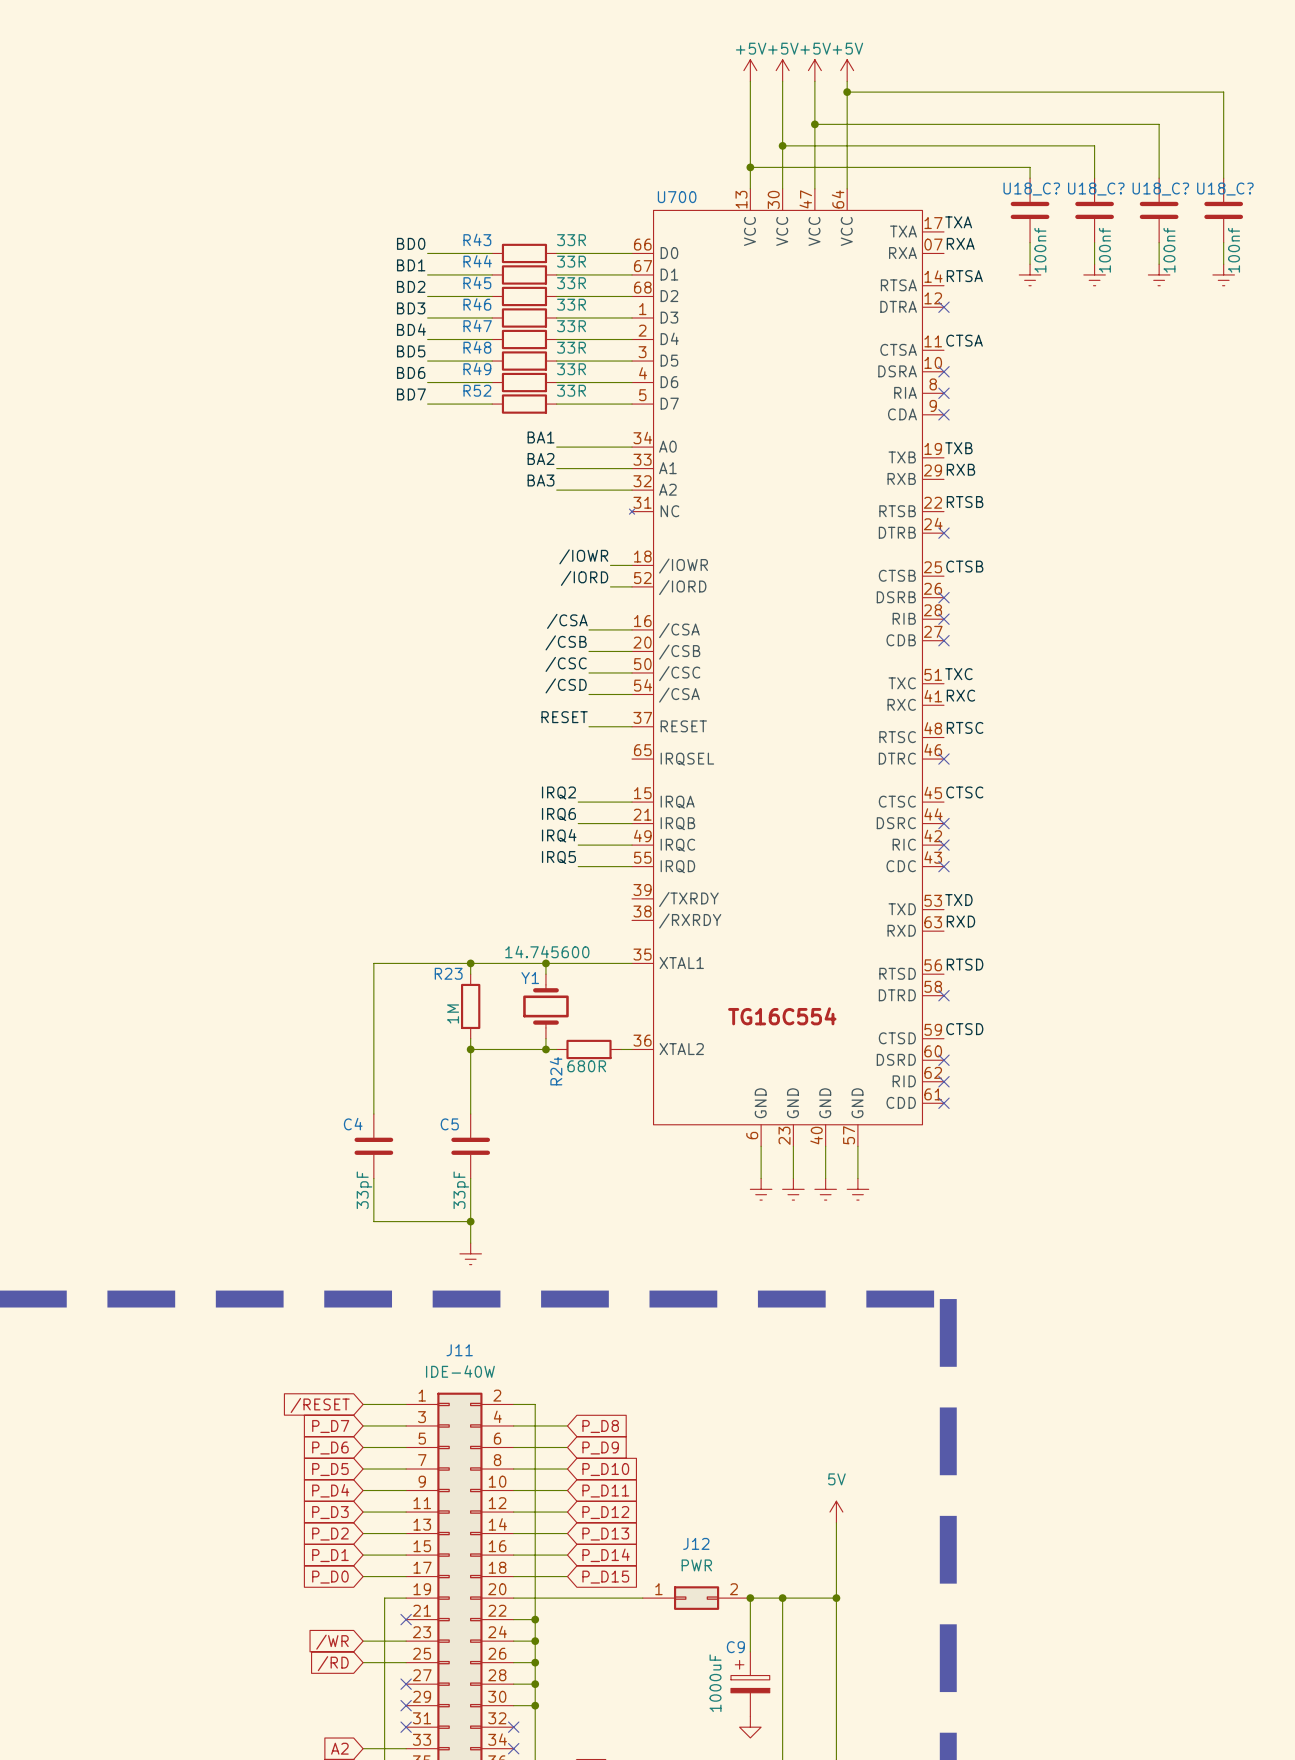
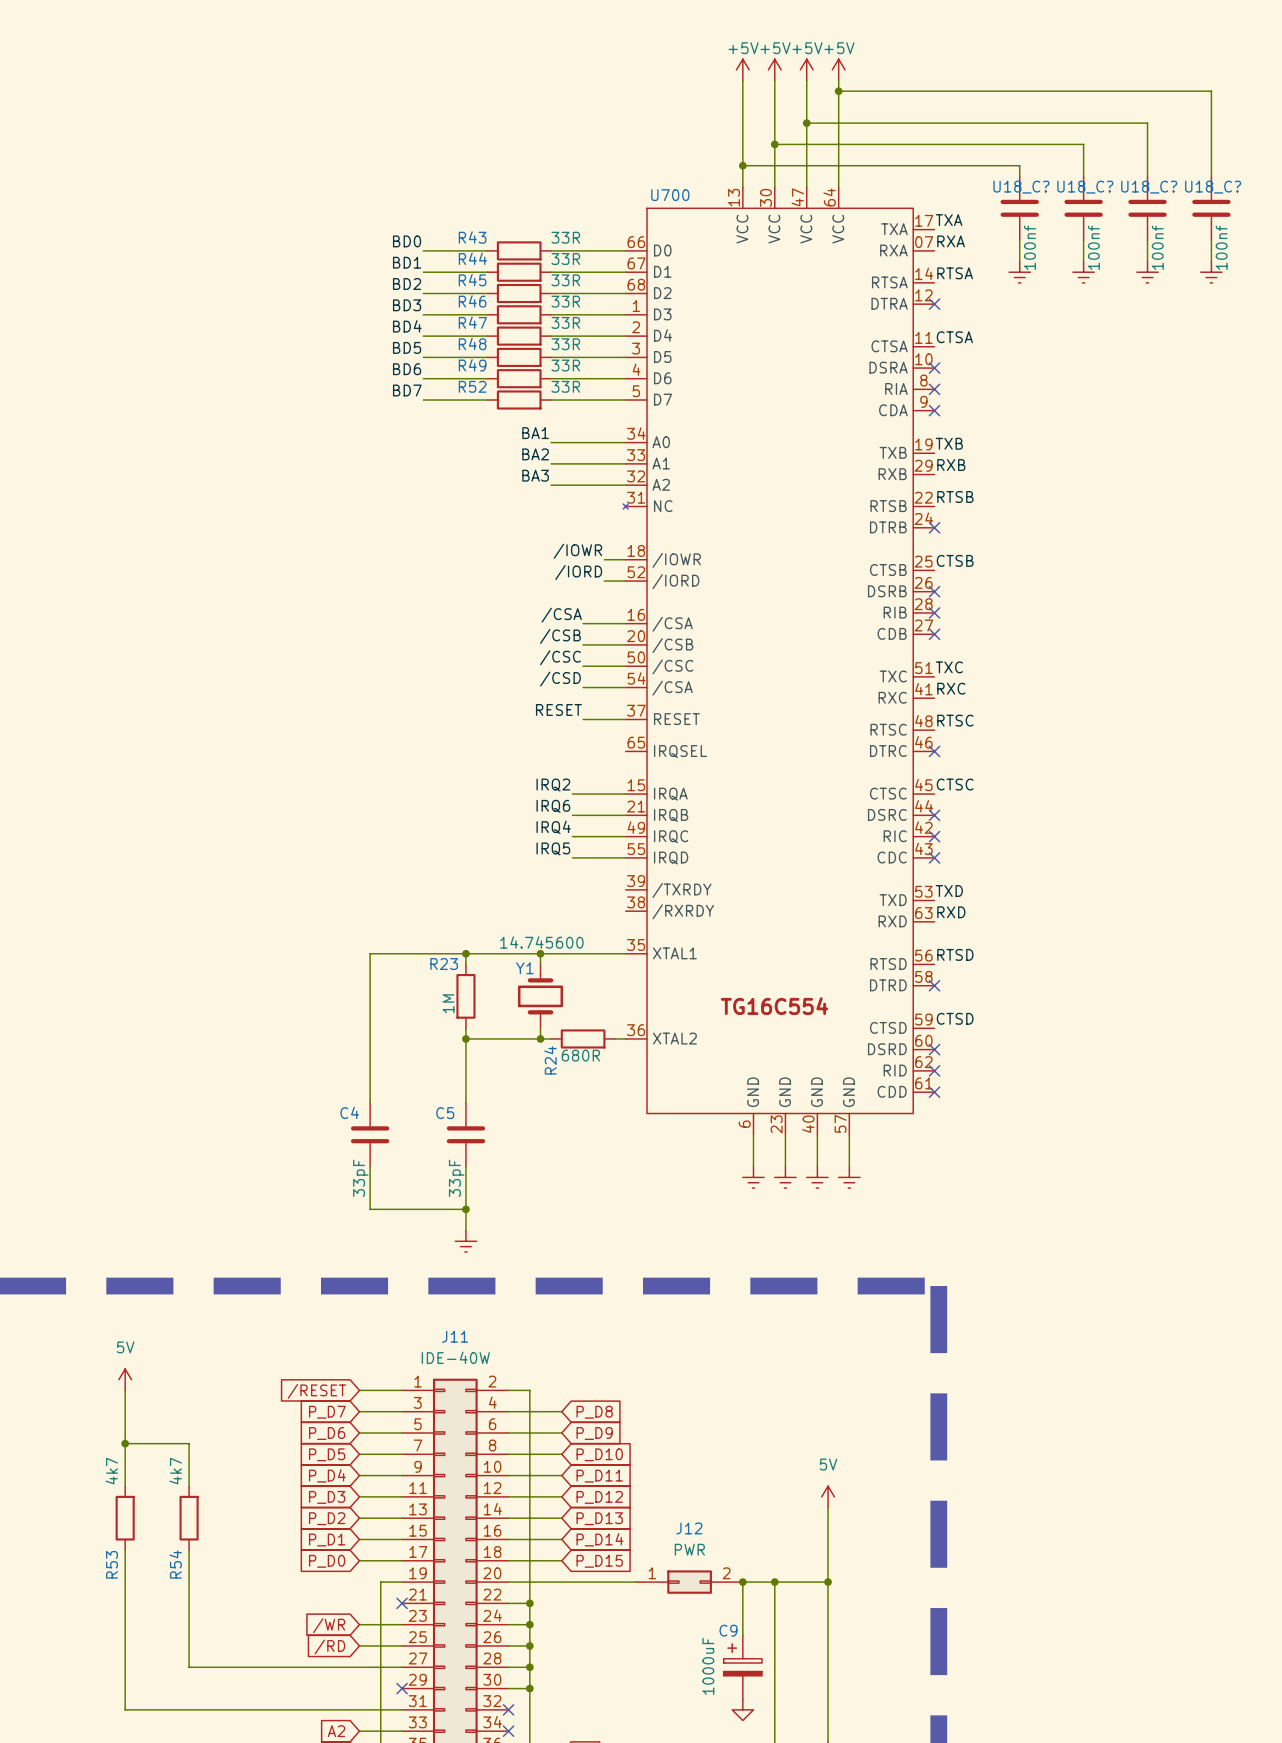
power symbol: none -> 5V (125, 1379)
wire: none -> (125, 1390) (125, 1486)
wire: none -> (125, 1443) (189, 1443) (189, 1486)
junction: none -> (125, 1443)
R53: none -> 4k7 (125, 1518)
R54: none -> 4k7 (189, 1518)
wire: none -> (125, 1550) (125, 1709) (402, 1709)
wire: none -> (189, 1550) (189, 1667) (402, 1667)
no-connect mark: (406, 1684) -> none
no-connect mark: (406, 1727) -> none

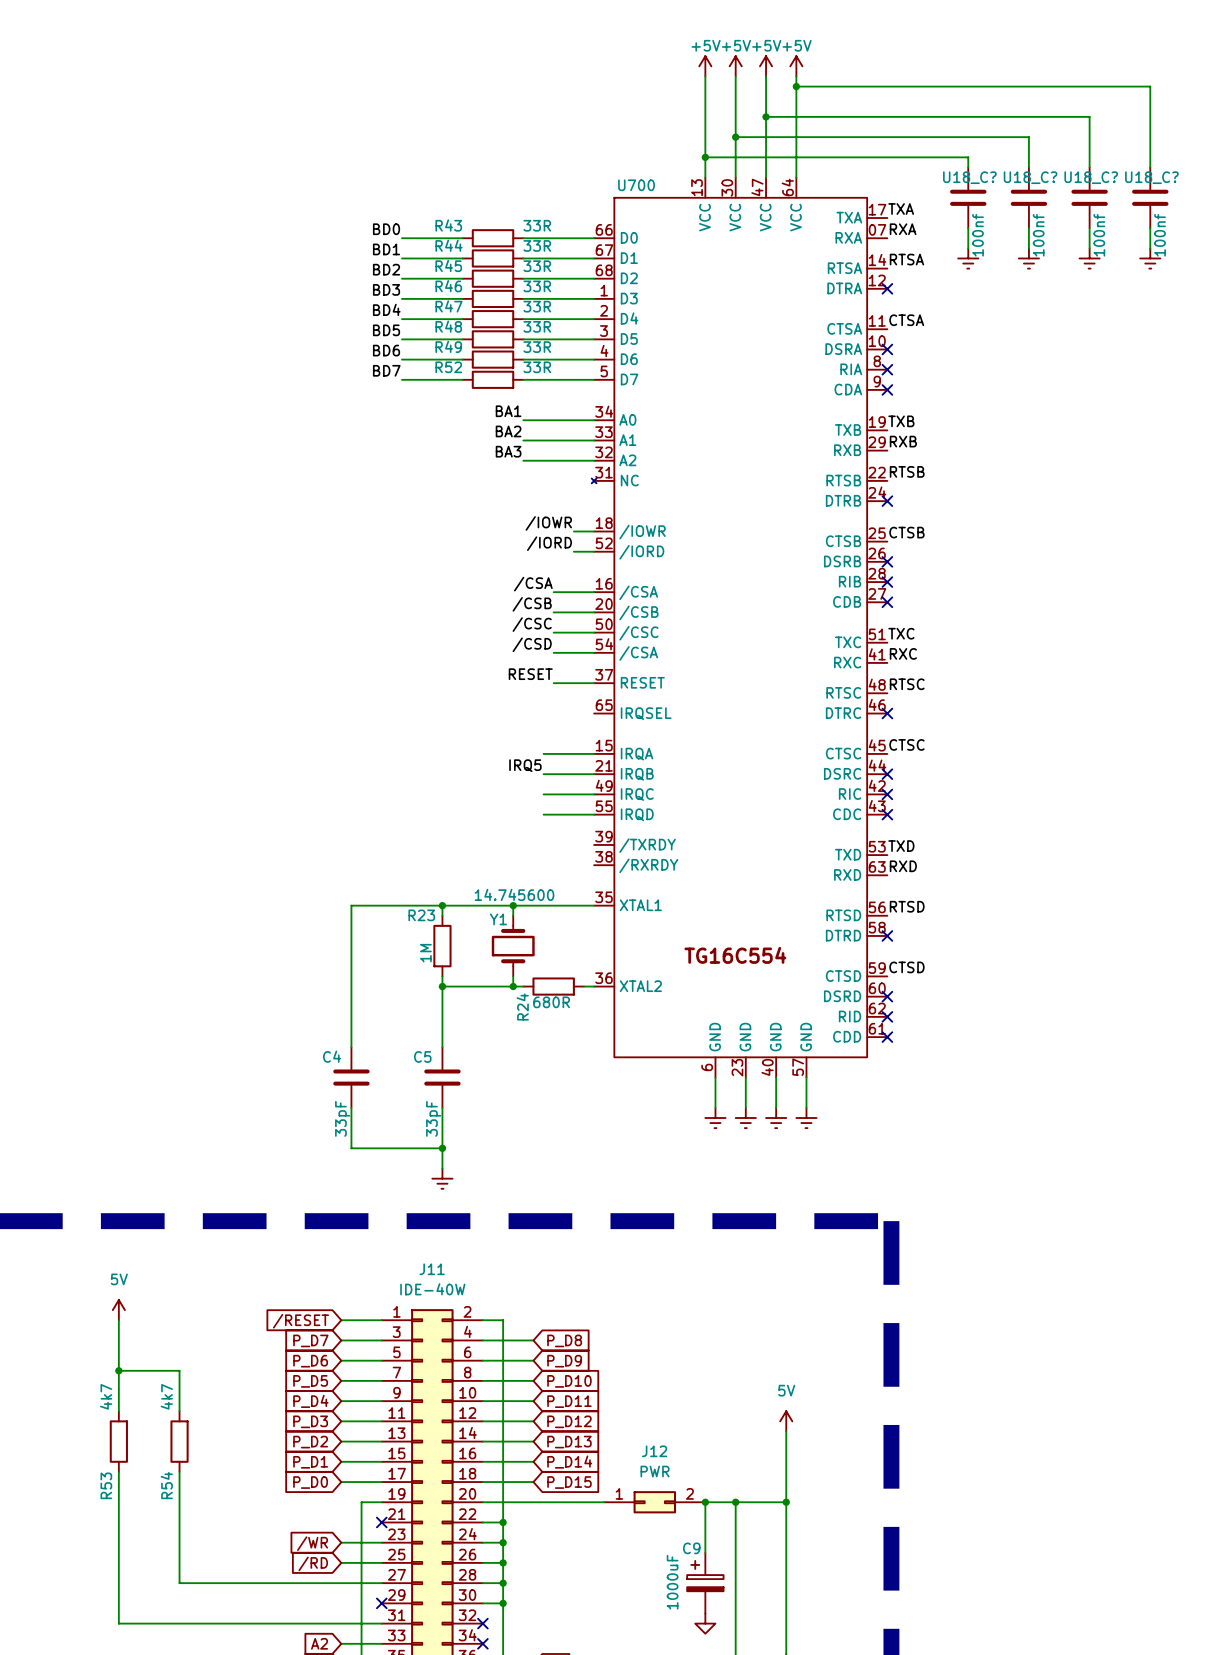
label: IRQ2 (553, 785) -> none
label: IRQ6 (553, 806) -> IRQ5 (525, 765)
label: IRQ4 (553, 827) -> none
label: IRQ5 (553, 848) -> none

